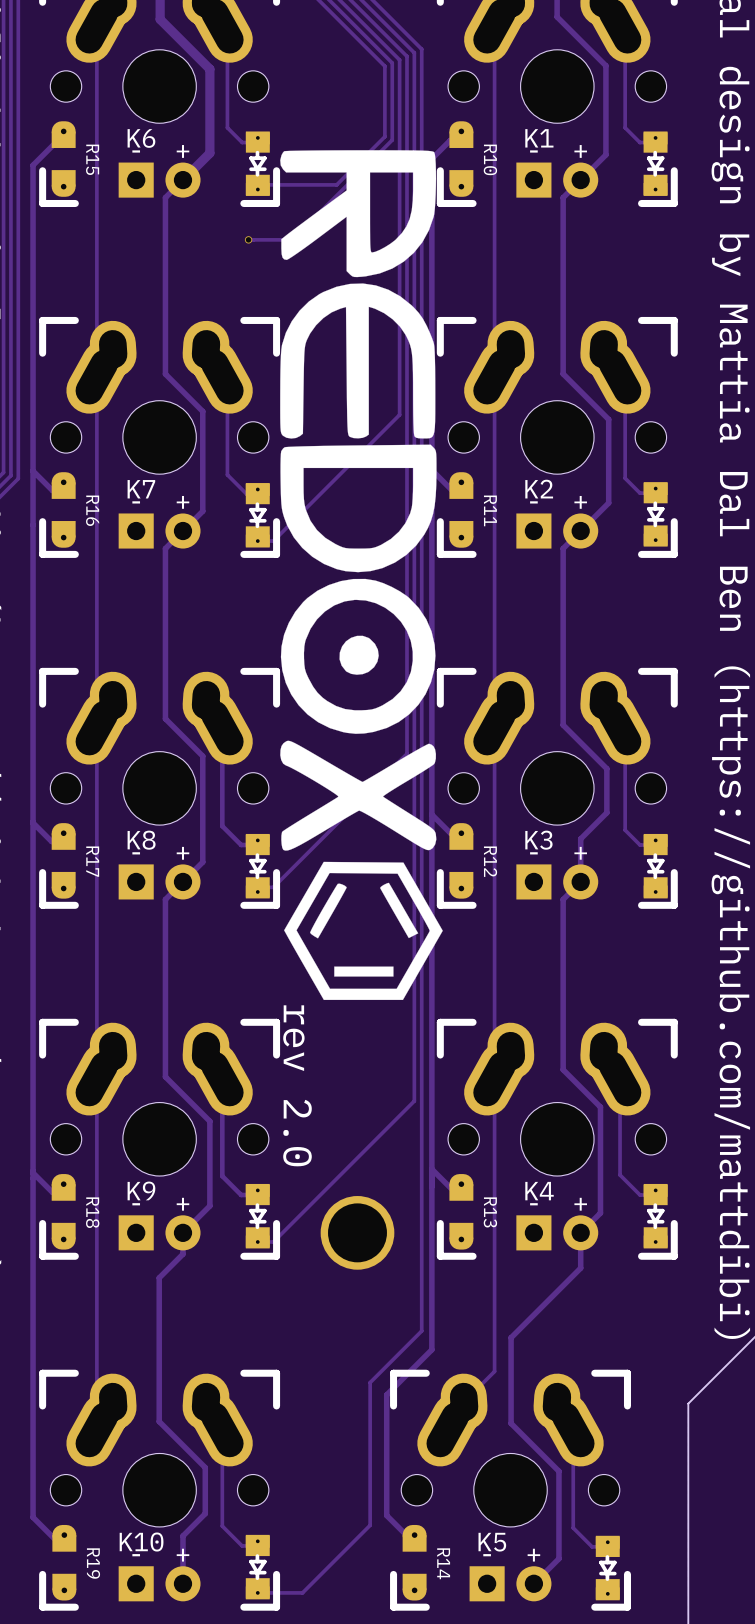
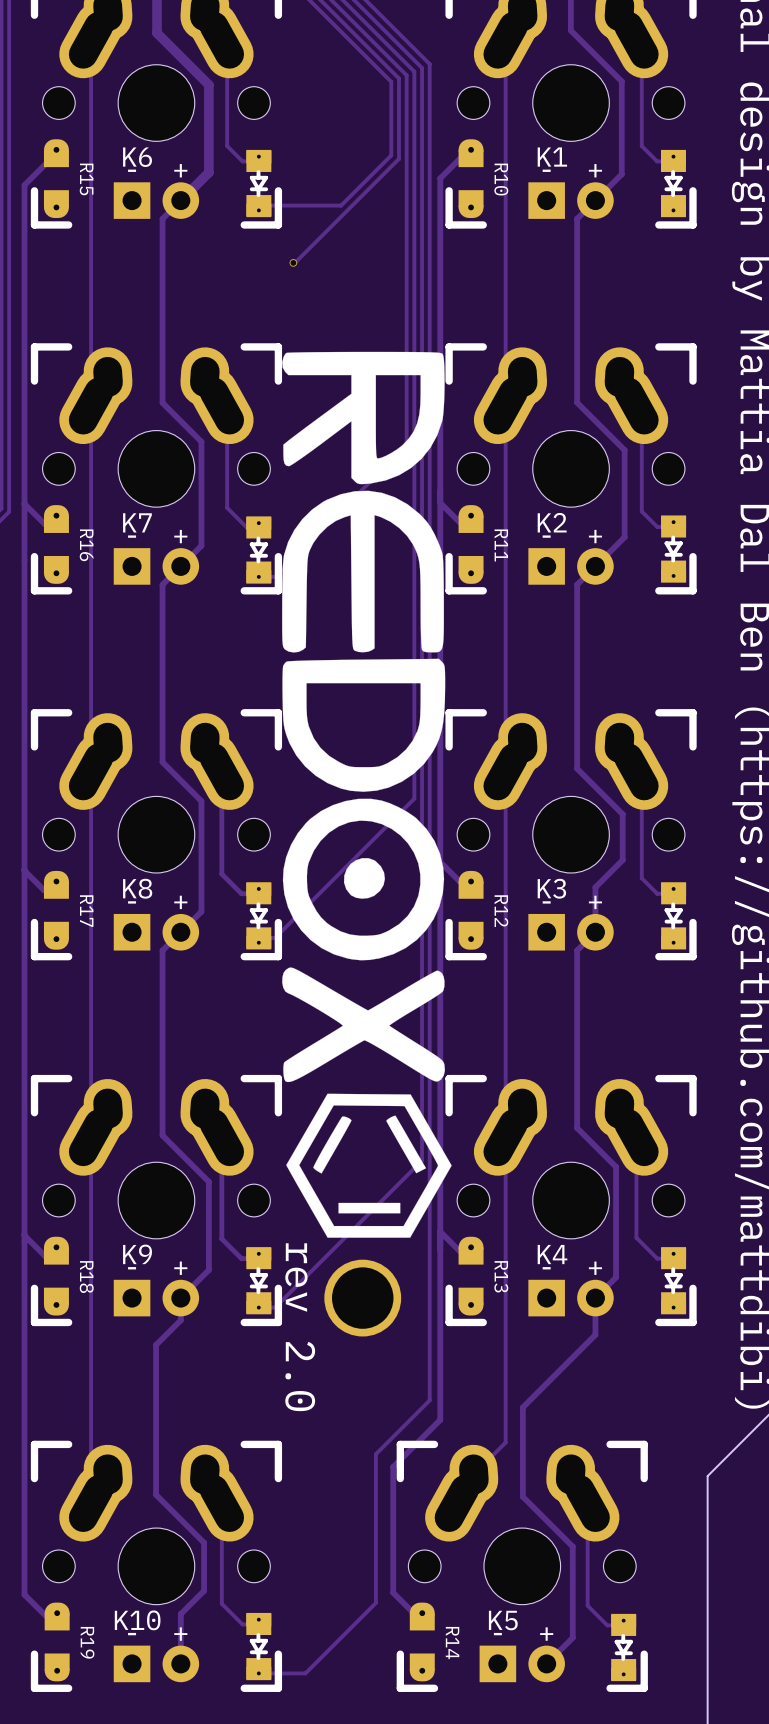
via position: (248, 239) -> (293, 262)
track: (290, 239) (248, 239) -> none
drawing position: (361, 575) -> (366, 794)
text position: rev 2.0 (297, 1085) -> rev 2.0 (300, 1327)

